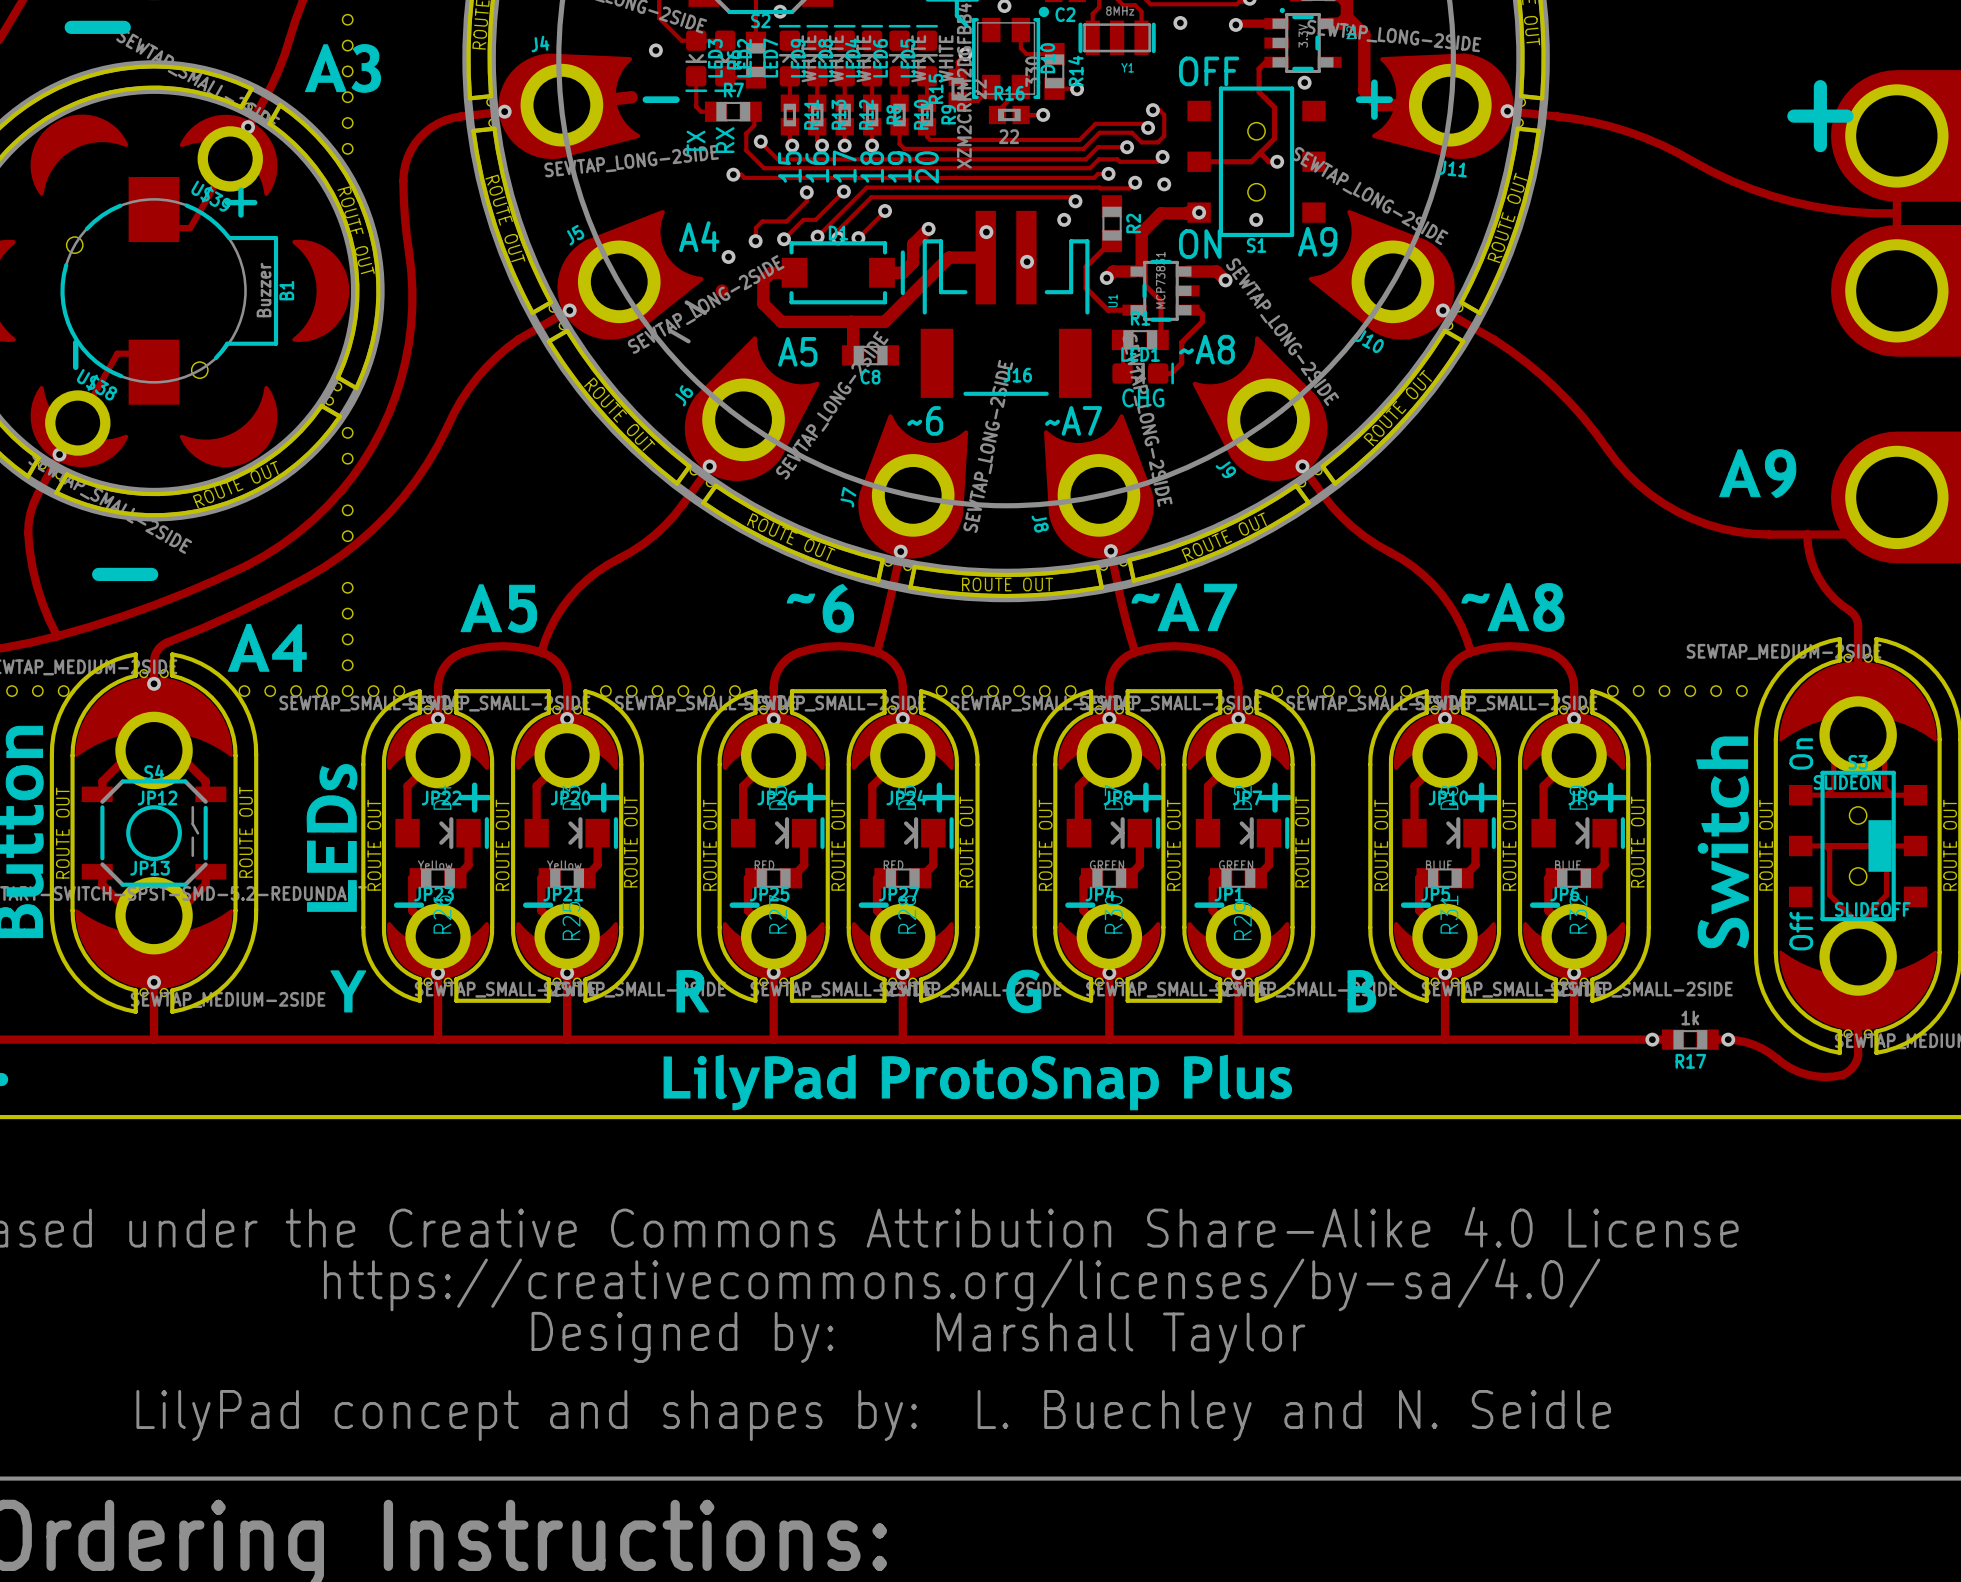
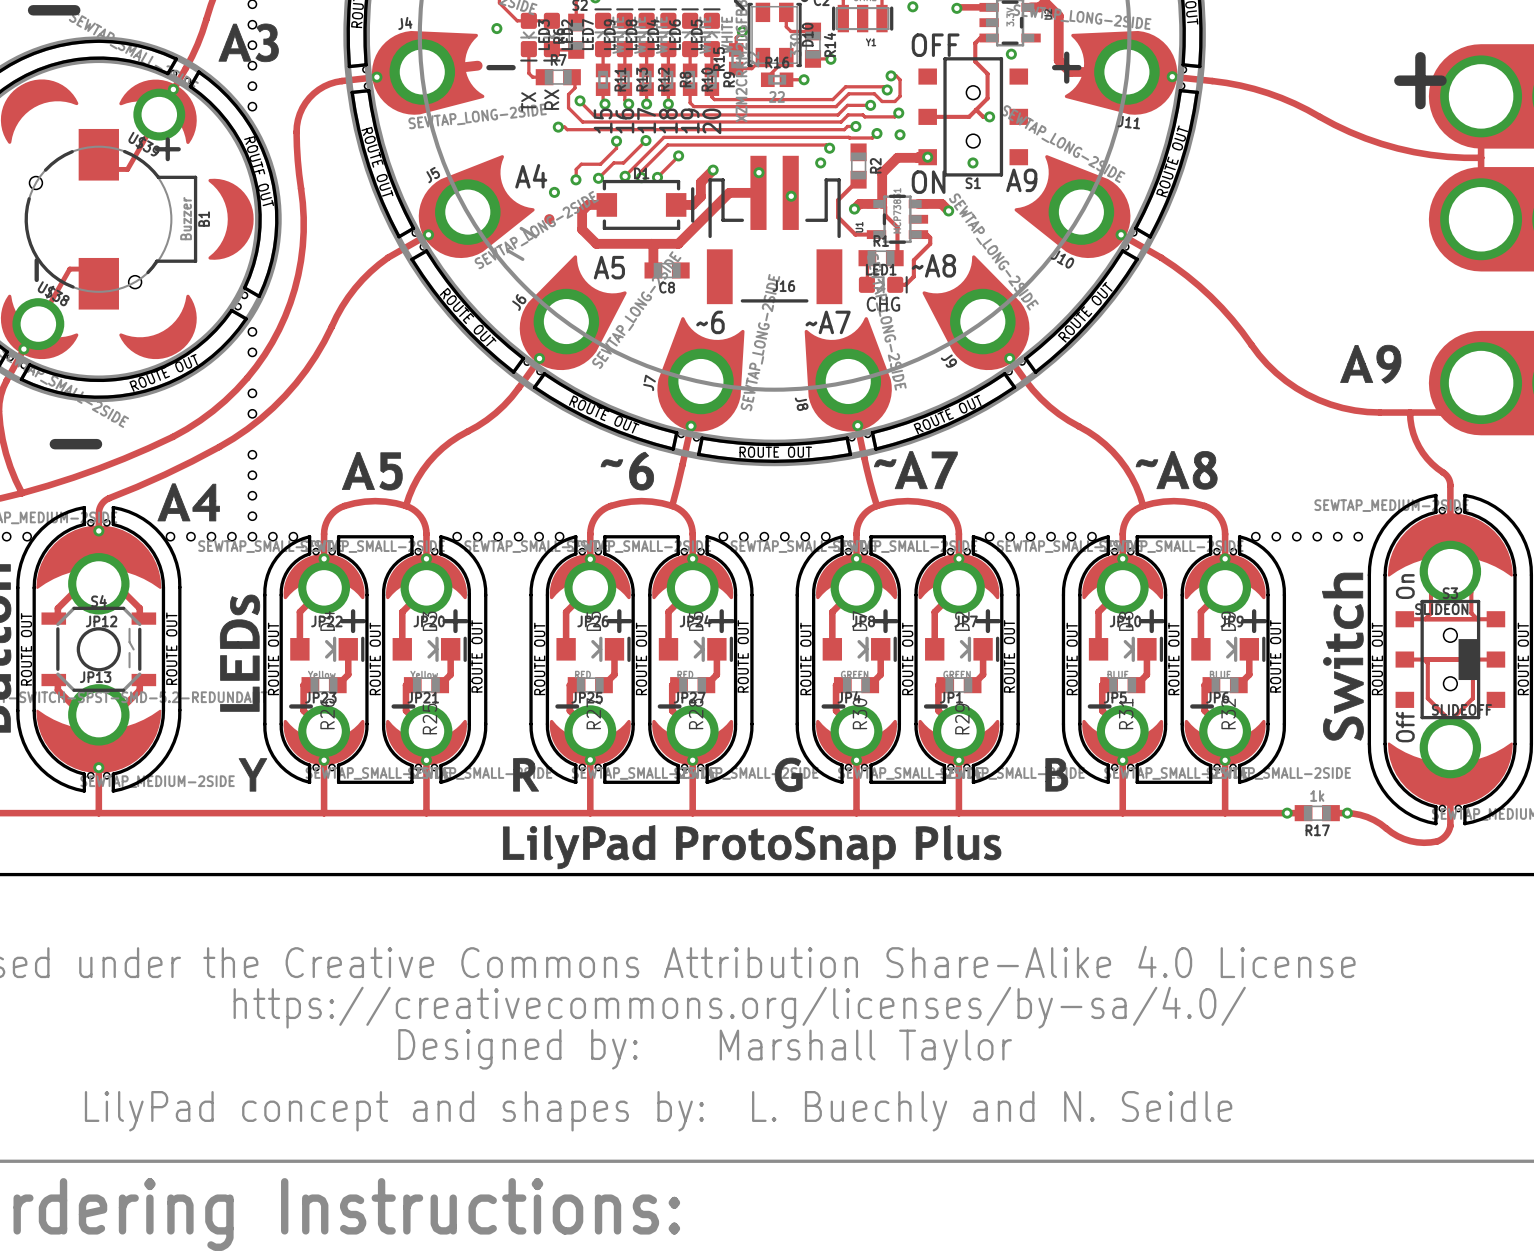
text: LilyPad concept and shapes by: L. Buechley and N. Seidle (873, 1415) -> LilyPad concept and shapes by: L. Buechly and N. Seidle (658, 1111)

